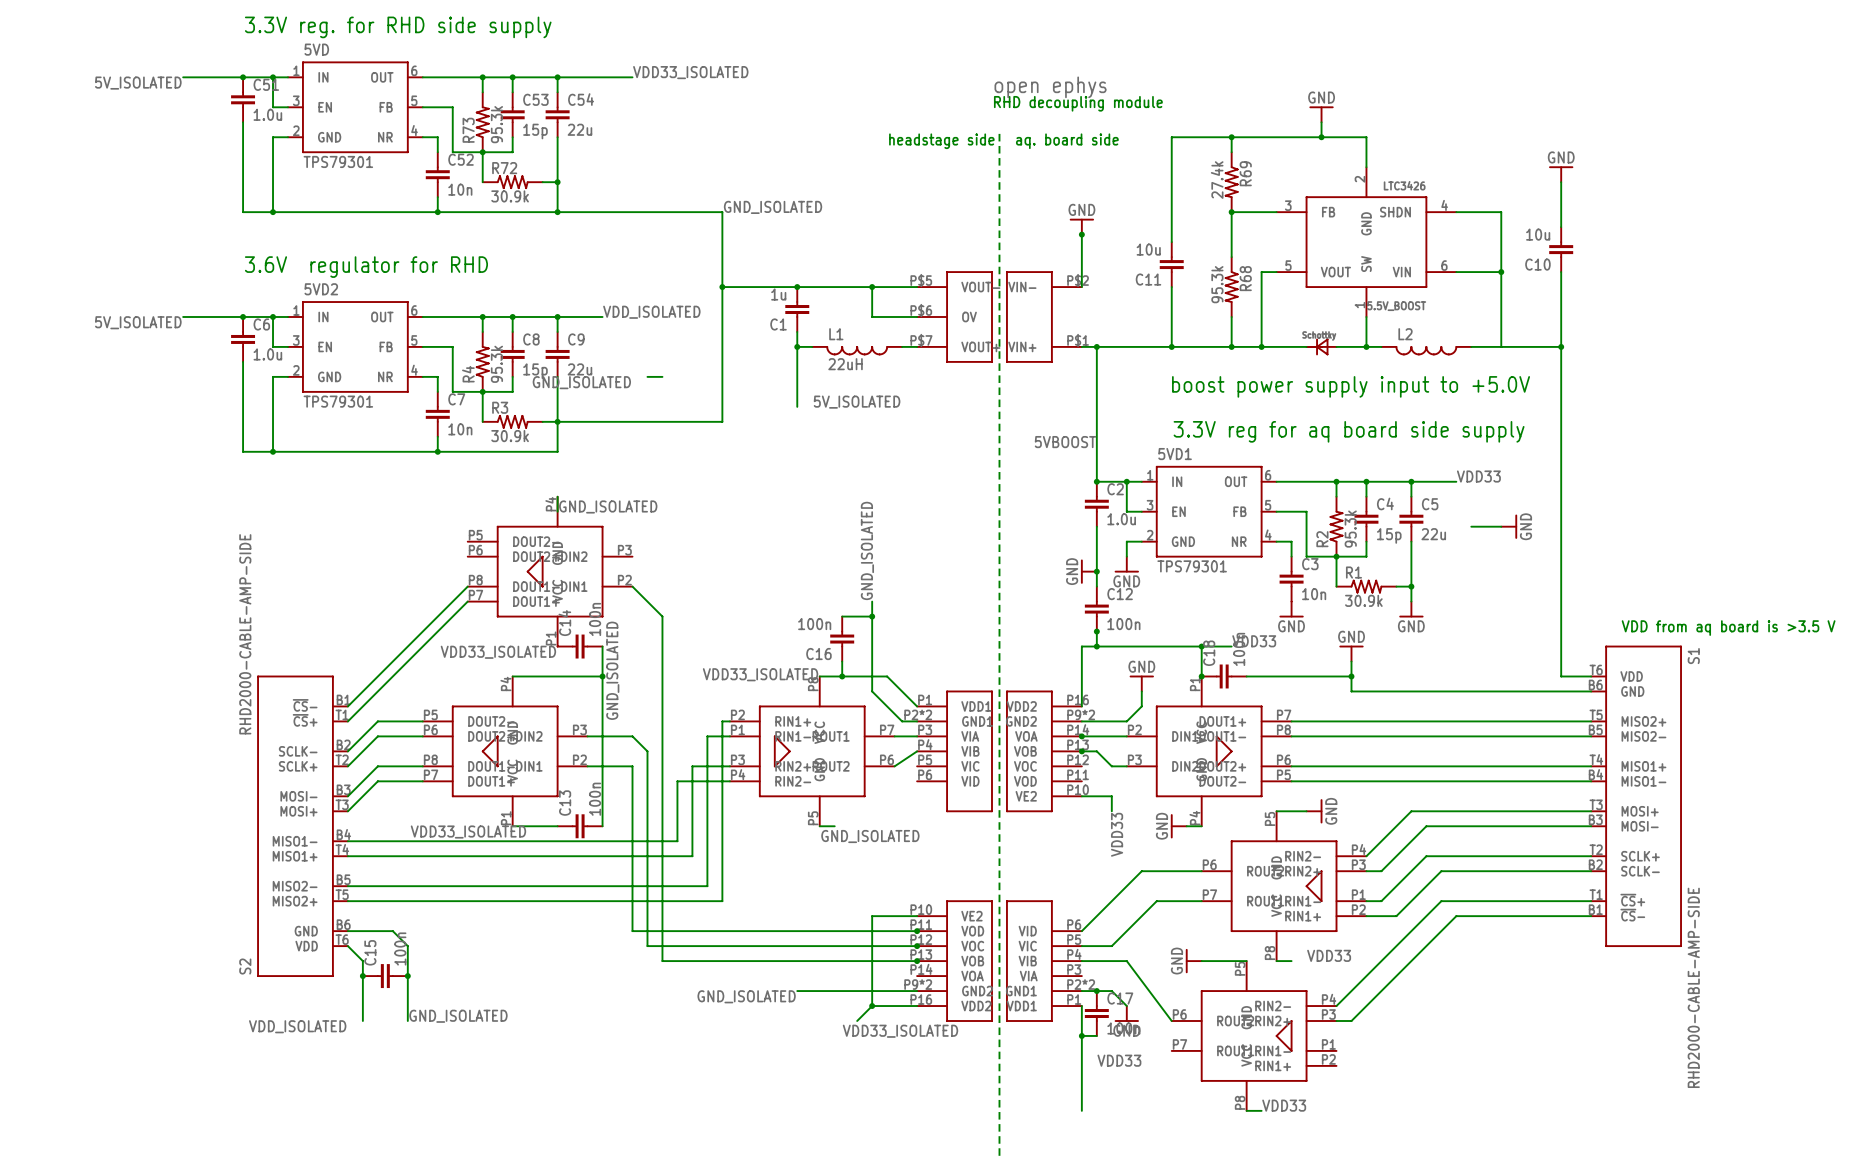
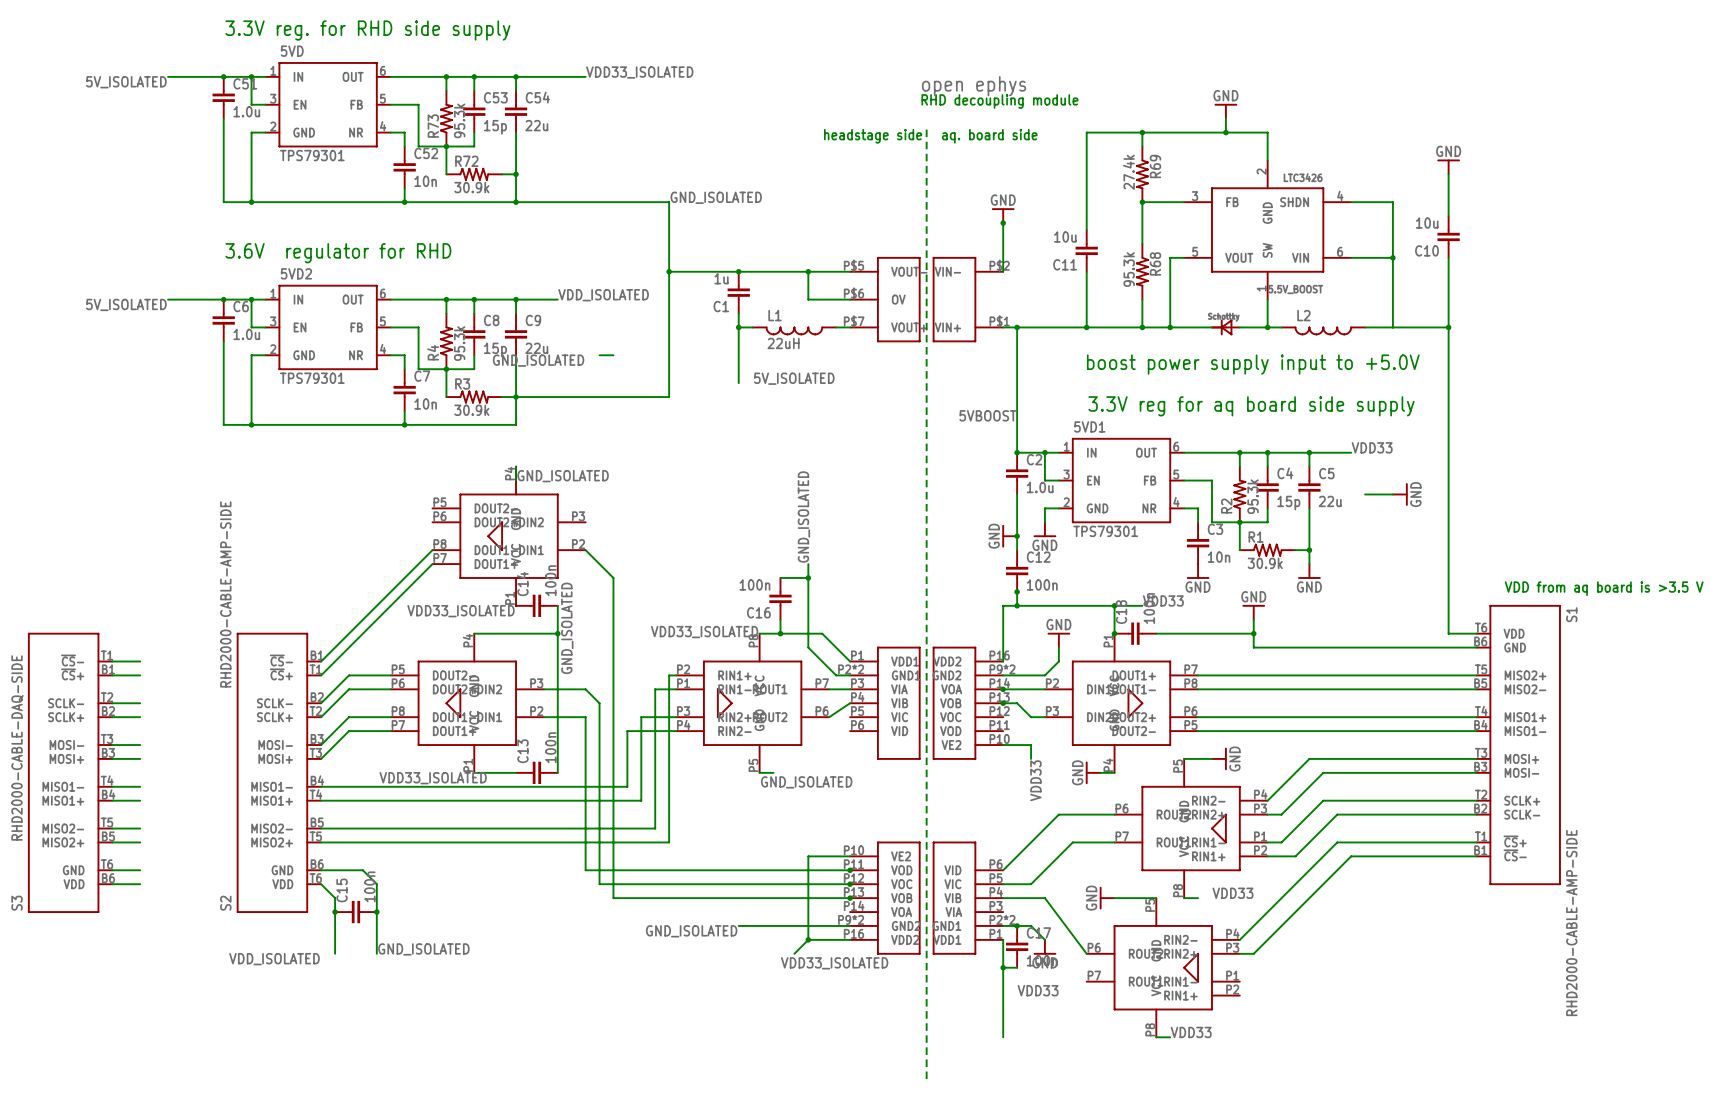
wire: none -> (112, 661) (140, 661)
wire: none -> (112, 675) (140, 675)
wire: none -> (112, 703) (140, 703)
wire: none -> (112, 717) (140, 717)
wire: none -> (112, 745) (140, 745)
wire: none -> (112, 758) (140, 758)
S3: none -> RHD2000-CABLE-DAQ-SIDE (70, 772)
wire: none -> (112, 786) (140, 786)
wire: none -> (112, 800) (140, 800)
wire: none -> (112, 828) (140, 828)
wire: none -> (112, 842) (140, 842)
wire: none -> (112, 870) (140, 870)
wire: none -> (112, 884) (140, 884)

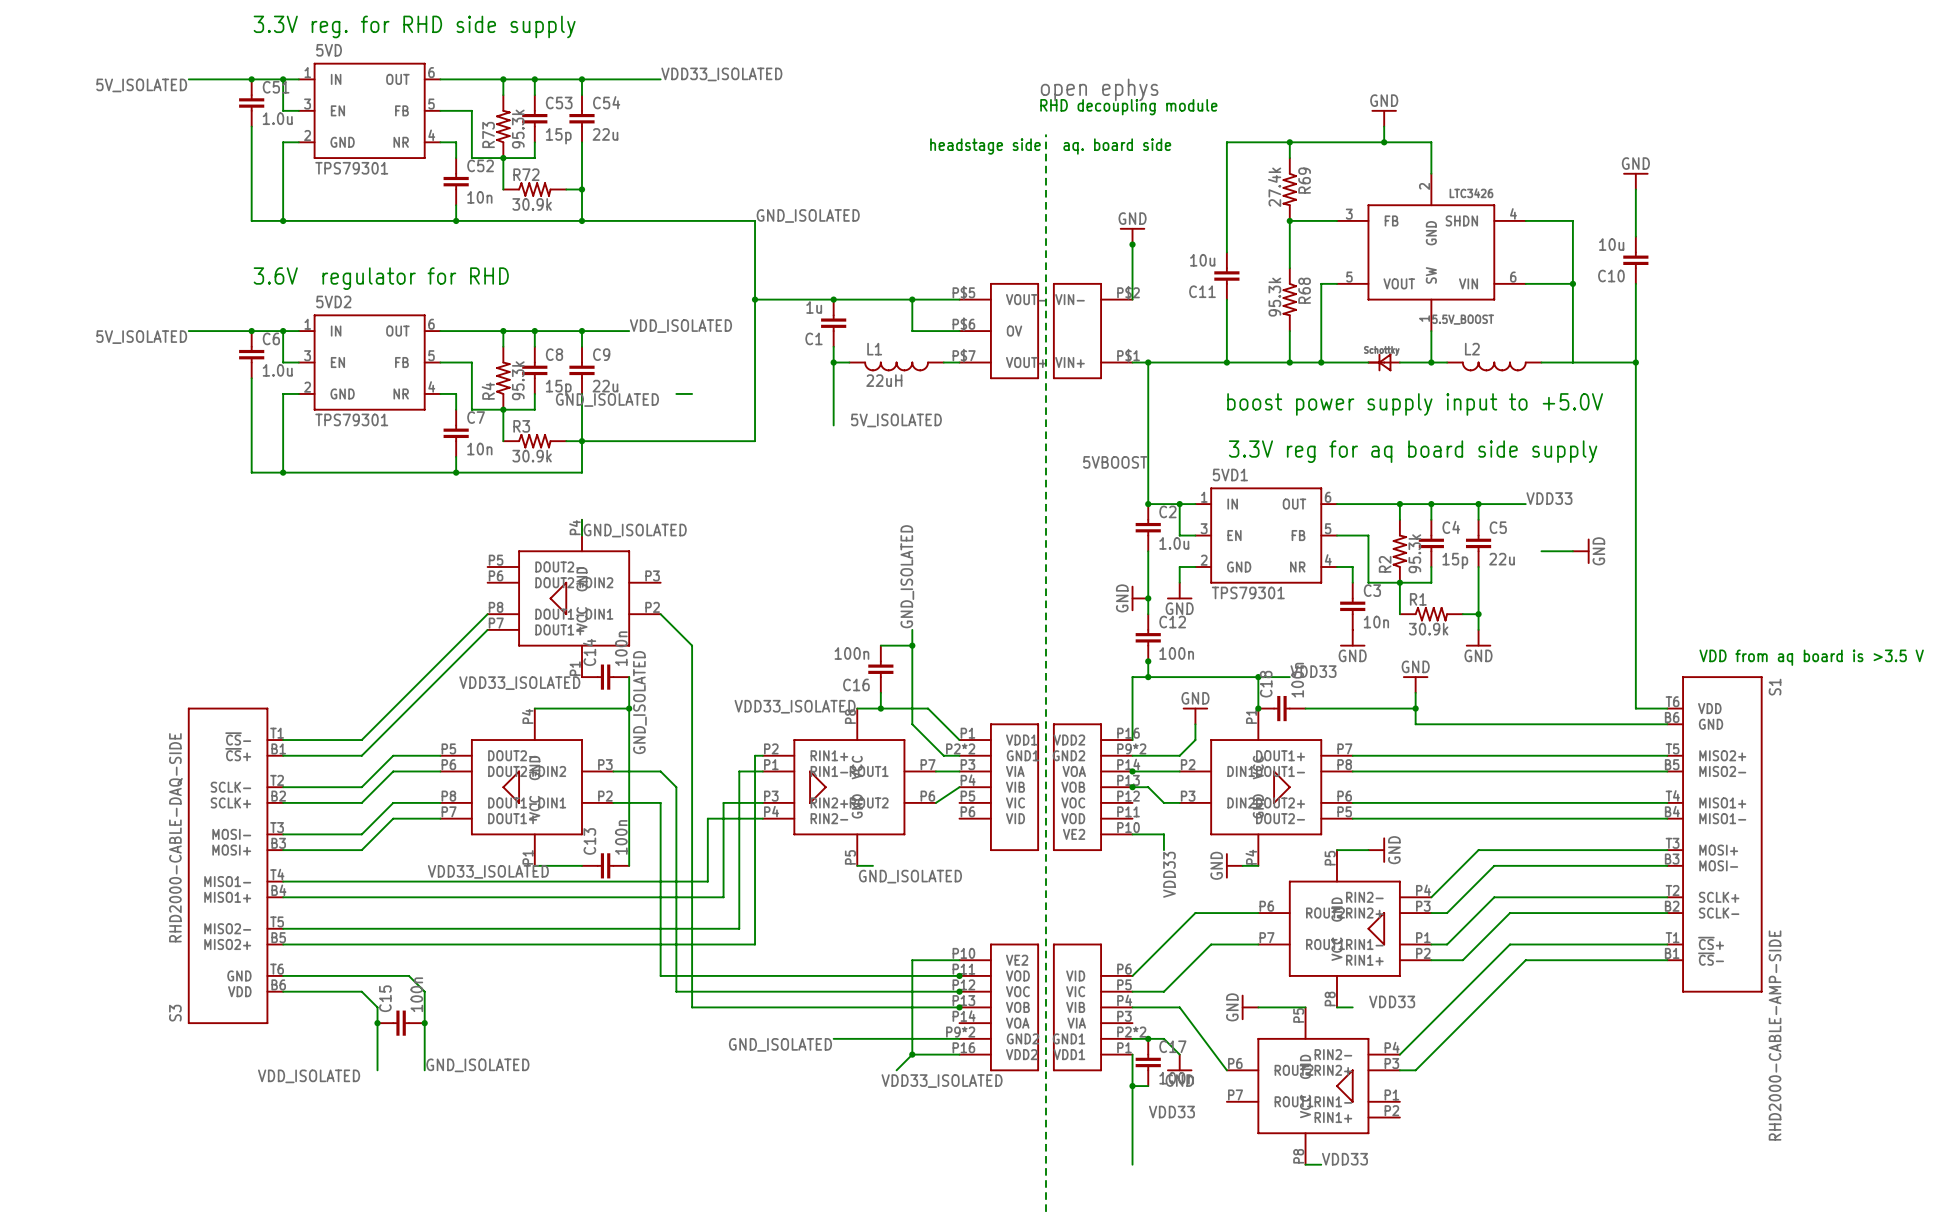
wire: (112, 661) (140, 661) -> none
wire: none -> (283, 740) (361, 740)
wire: (112, 675) (140, 675) -> none
wire: none -> (283, 755) (361, 755)
wire: (112, 703) (140, 703) -> none
wire: none -> (283, 787) (361, 787)
wire: (112, 717) (140, 717) -> none
wire: none -> (283, 802) (361, 802)
wire: (112, 745) (140, 745) -> none
wire: none -> (283, 834) (361, 834)
wire: (112, 758) (140, 758) -> none
wire: none -> (283, 850) (361, 850)
S3 position: (70, 772) -> (235, 865)
S2: RHD2000-CABLE-AMP-SIDE (279, 772) -> none
wire: (112, 786) (140, 786) -> none
wire: none -> (283, 881) (361, 881)
wire: (112, 800) (140, 800) -> none
wire: none -> (283, 897) (361, 897)
wire: (112, 828) (140, 828) -> none
wire: none -> (283, 928) (361, 928)
wire: (112, 842) (140, 842) -> none
wire: none -> (283, 944) (361, 944)
wire: (112, 870) (140, 870) -> none
wire: none -> (283, 975) (361, 975)
wire: (112, 884) (140, 884) -> none
wire: none -> (283, 991) (361, 991)

